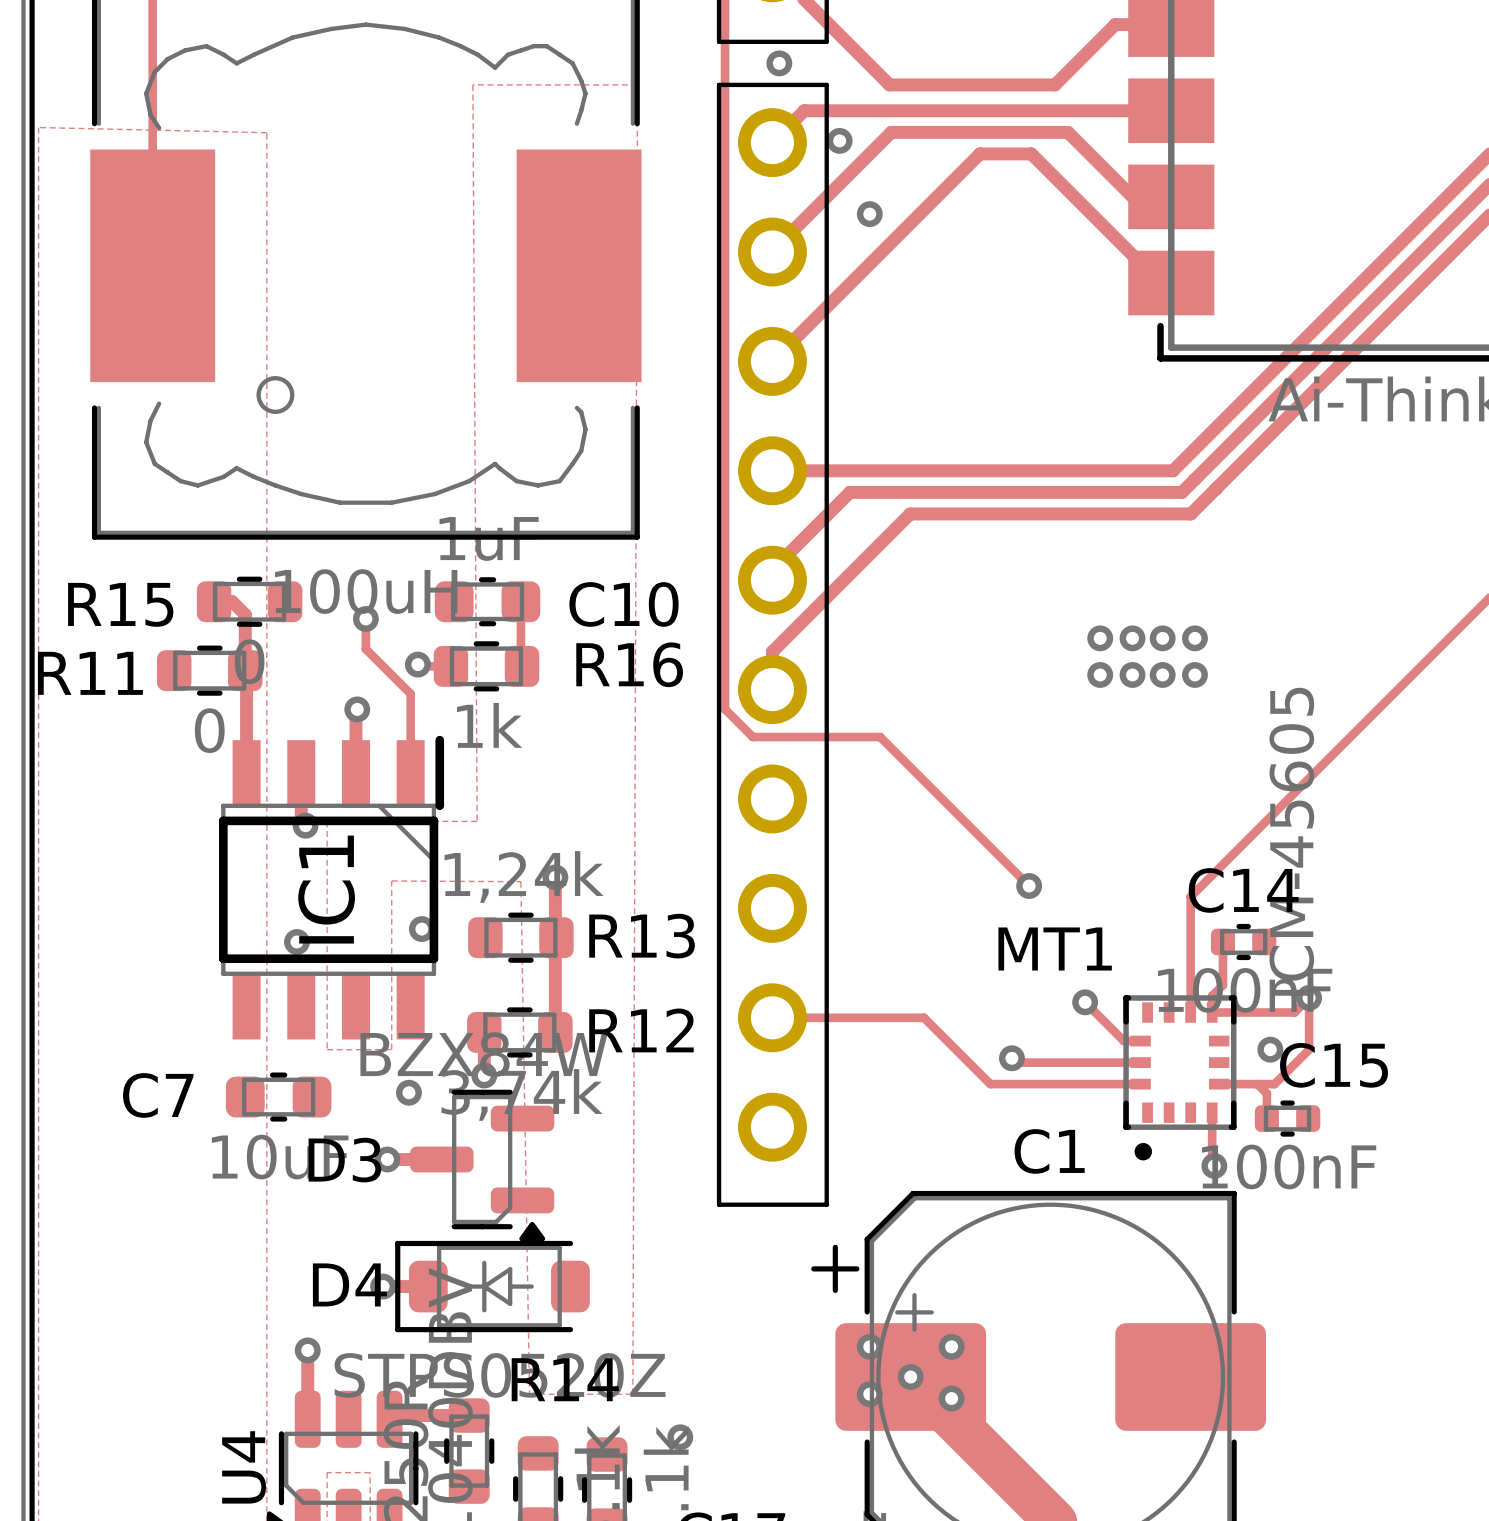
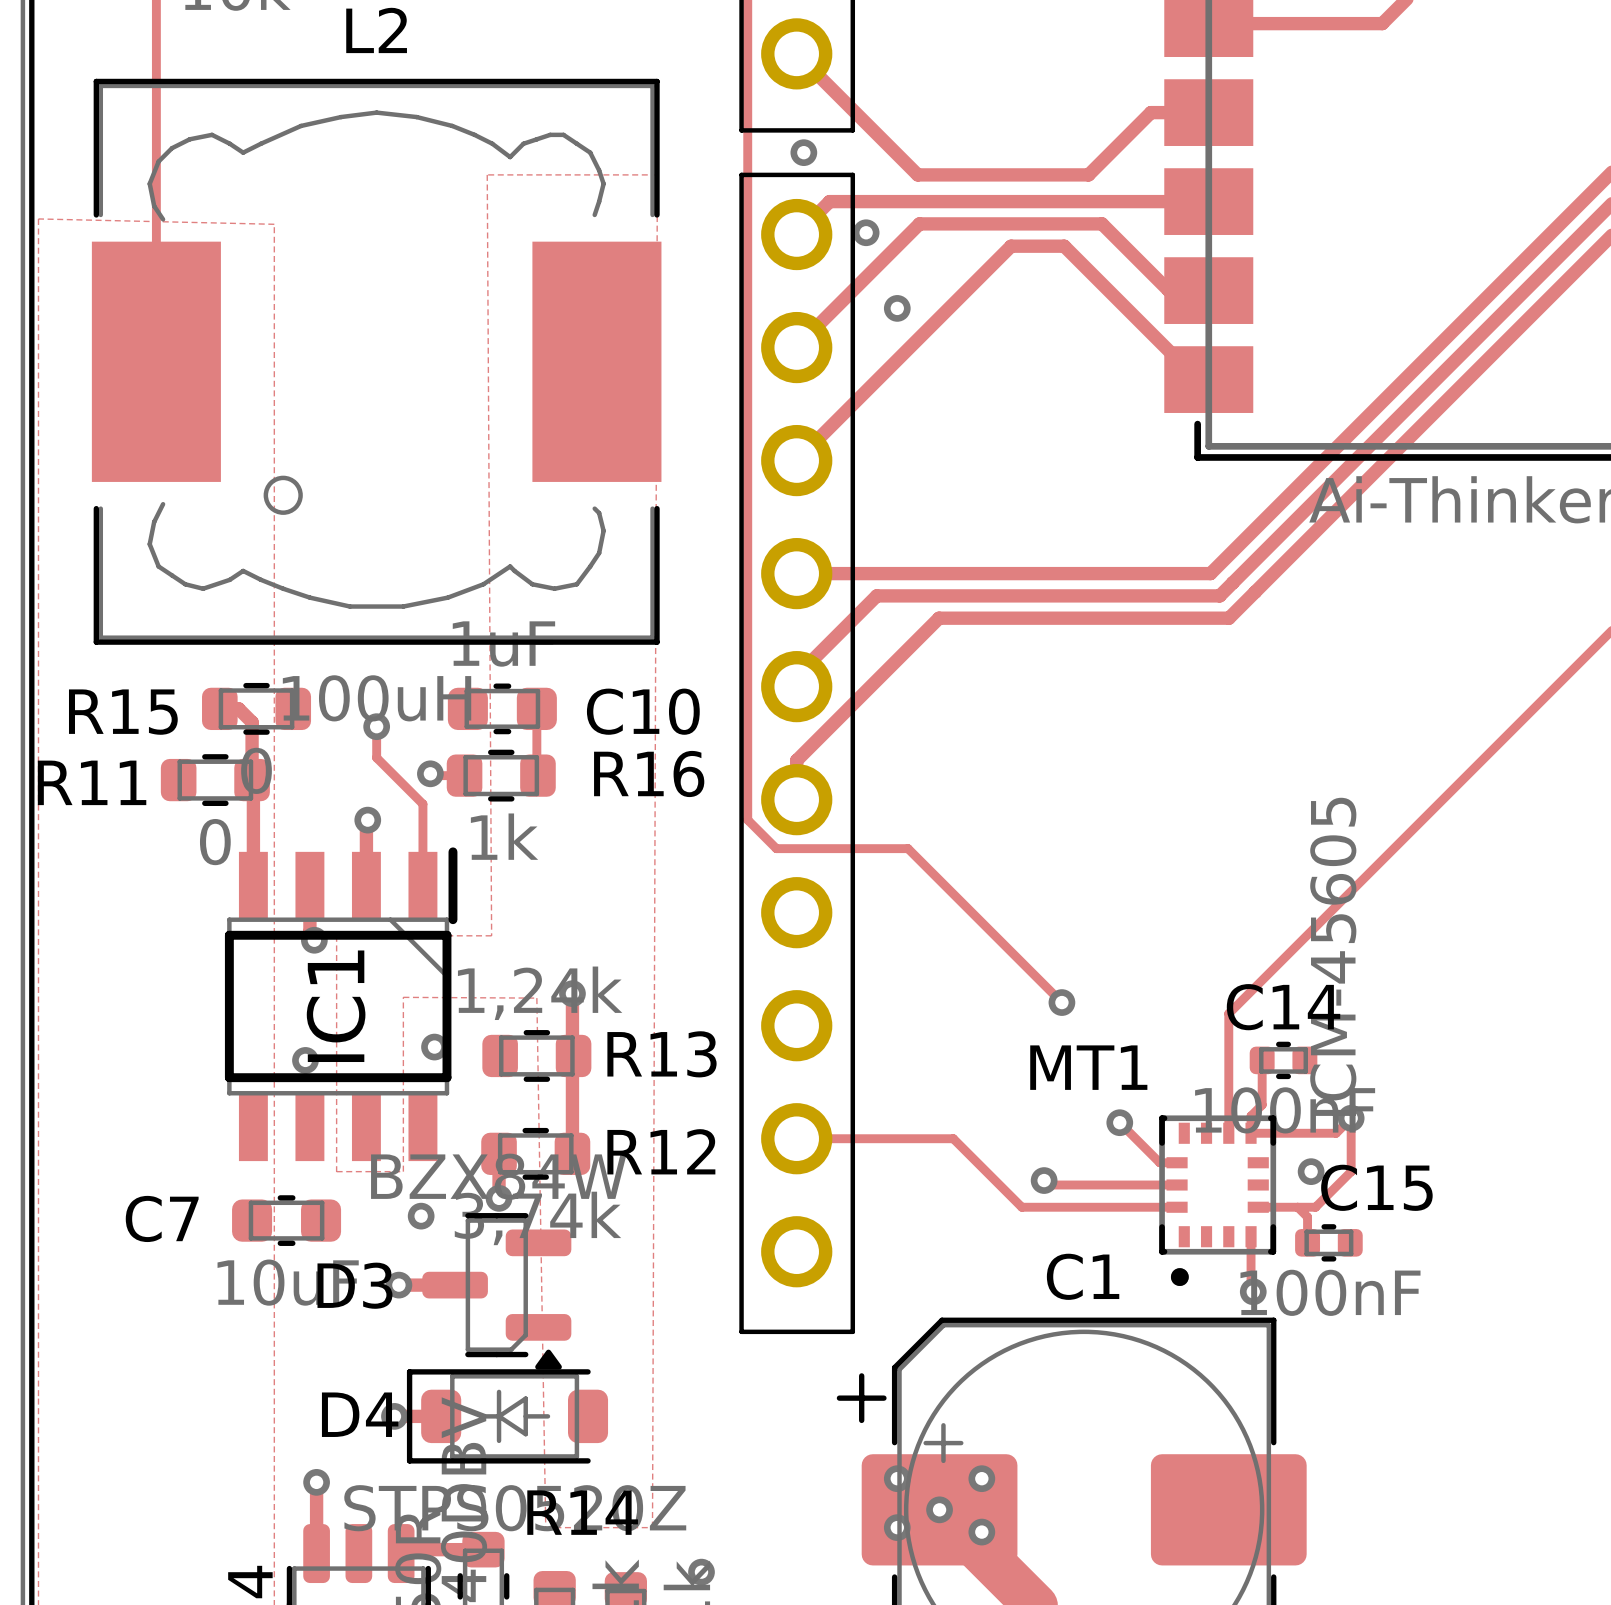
via: (1100, 638) -> none
via: (1132, 638) -> none
via: (1162, 638) -> none
via: (1194, 638) -> none
via: (1100, 674) -> none
via: (1132, 674) -> none
via: (1162, 674) -> none
via: (1194, 674) -> none

